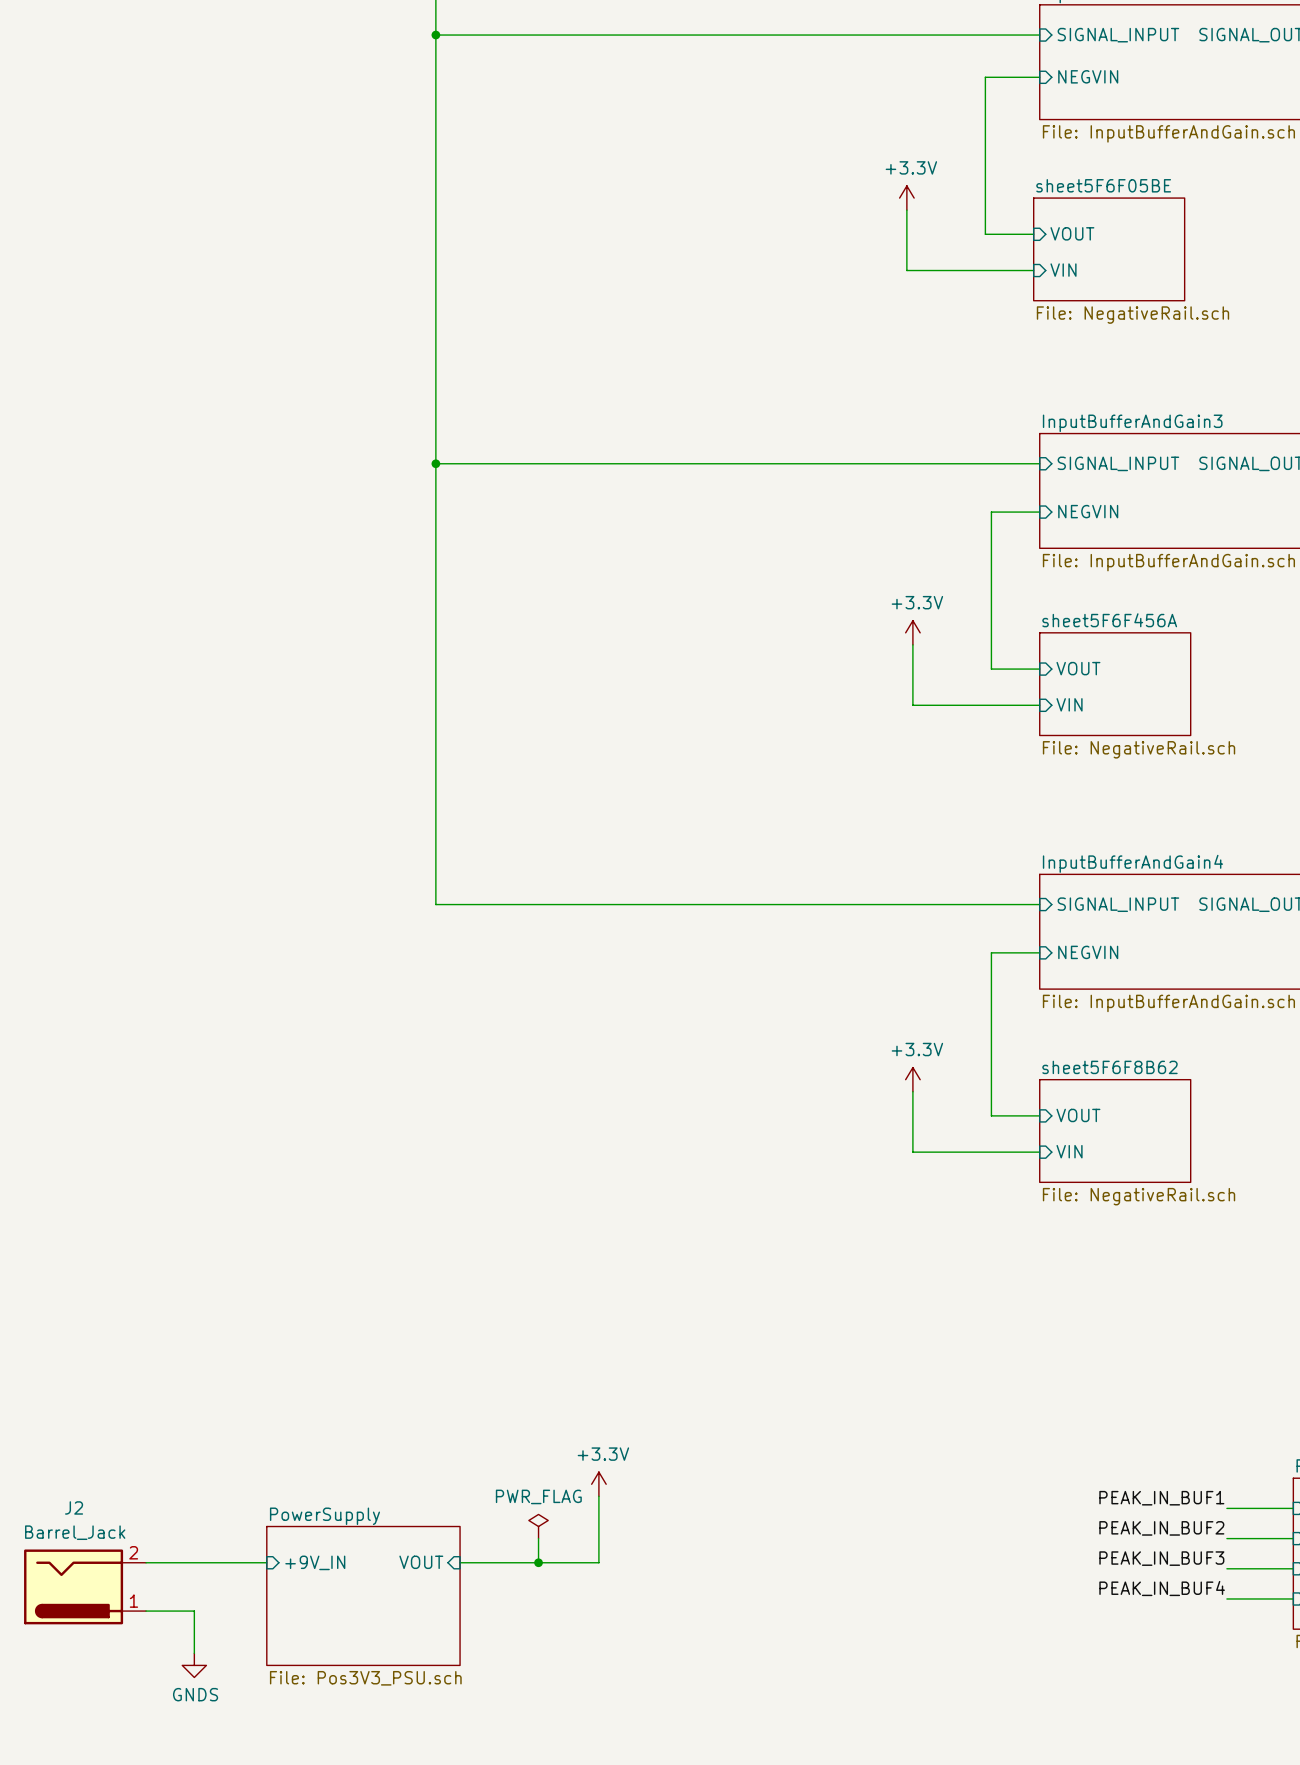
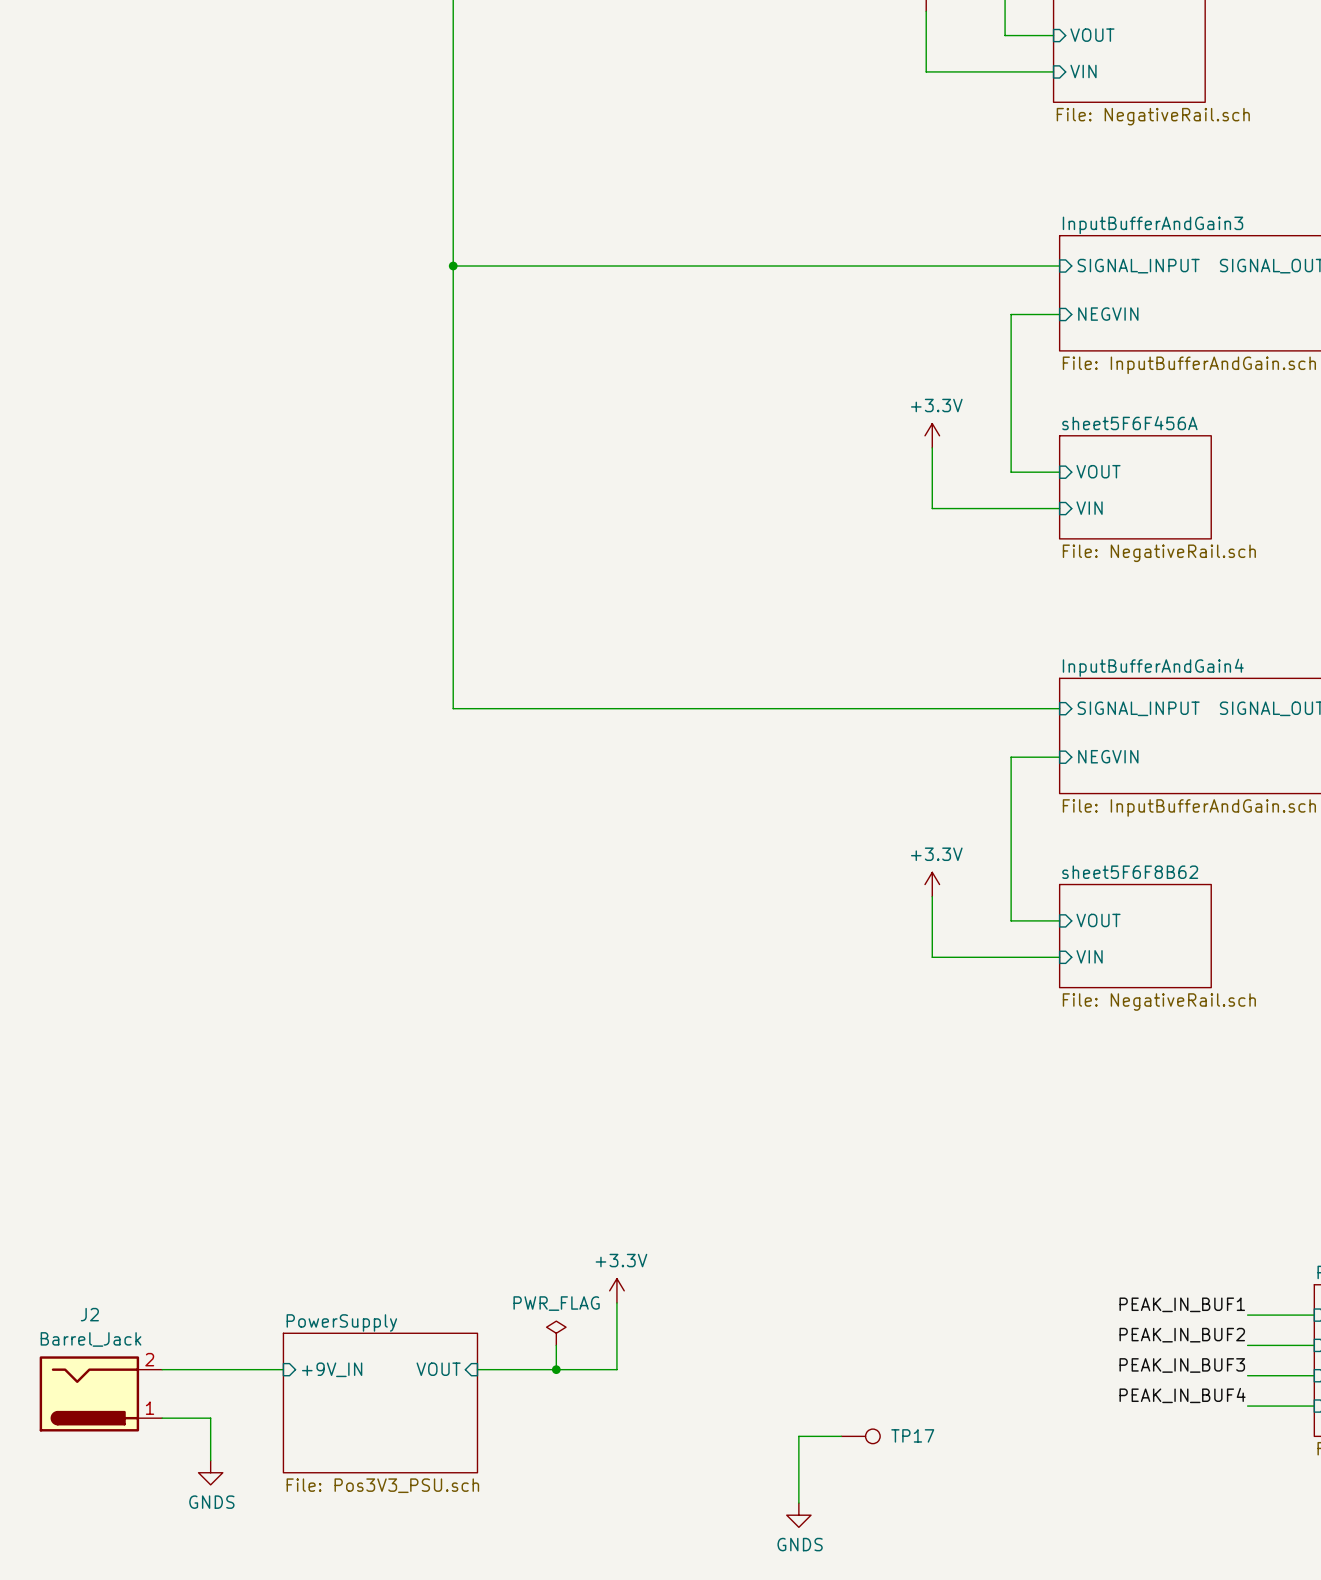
wire: none -> (841, 1436) (798, 1436) (798, 1503)
TP17: none -> (860, 1436)
power symbol: none -> GNDS (798, 1515)

